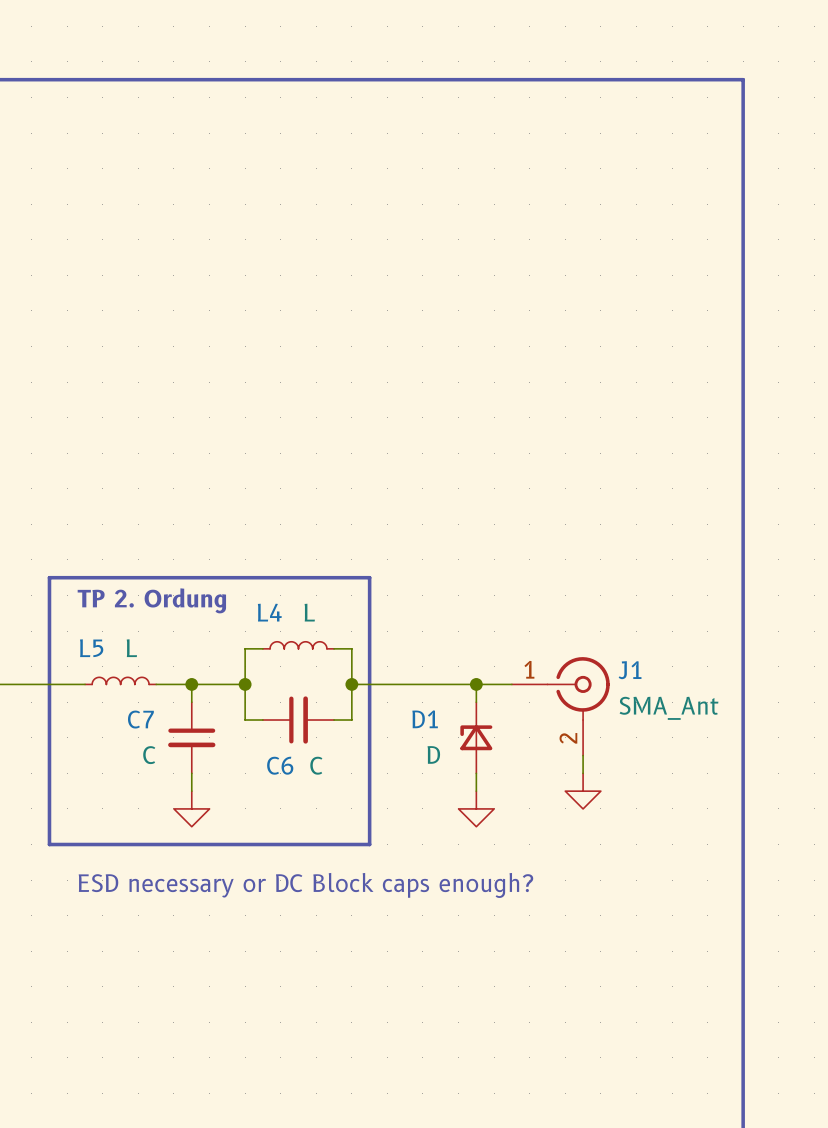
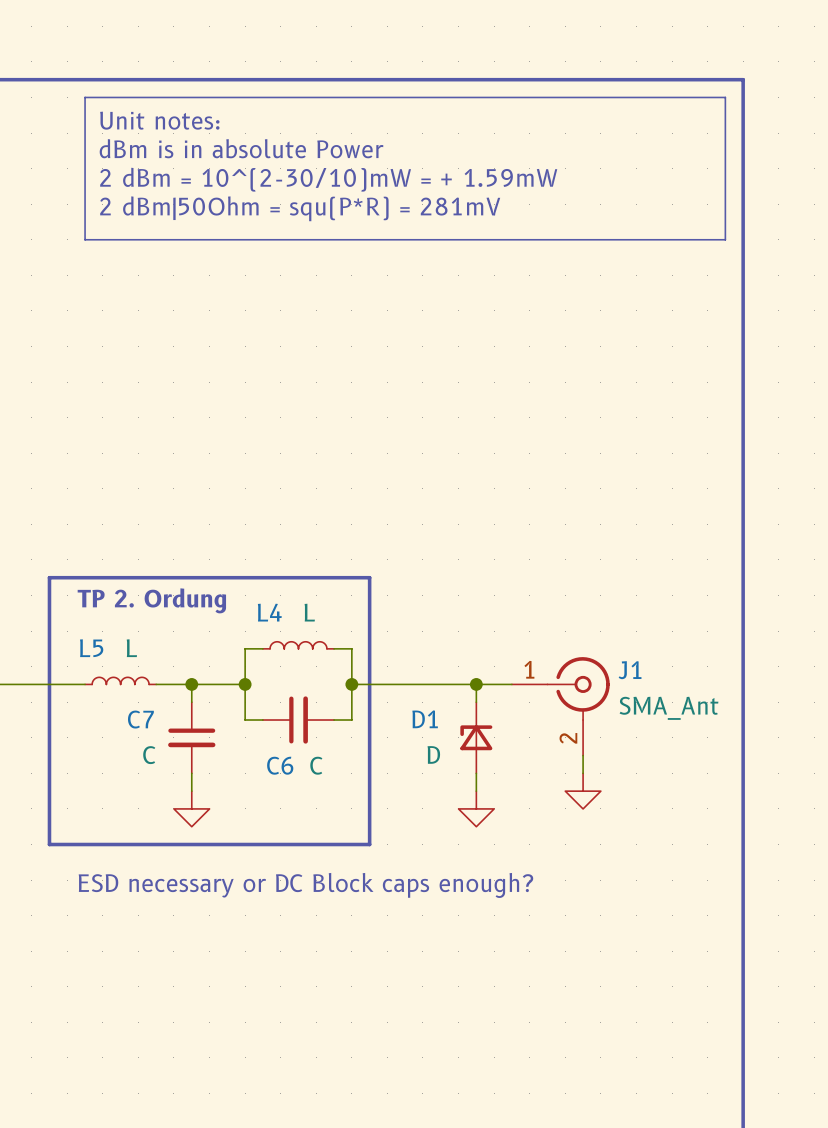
line: none -> (85, 97) (725, 97) (725, 239) (85, 239) (85, 97)
text: none -> Unit notes: (159, 120)
text: none -> dBm is in absolute Power (241, 148)
text: none -> 2 dBm = 10^(2-30/10)mW = + 1.59mW (328, 179)
text: none -> 2 dBm|50Ohm = squ(P*R) = 281mV (300, 208)

